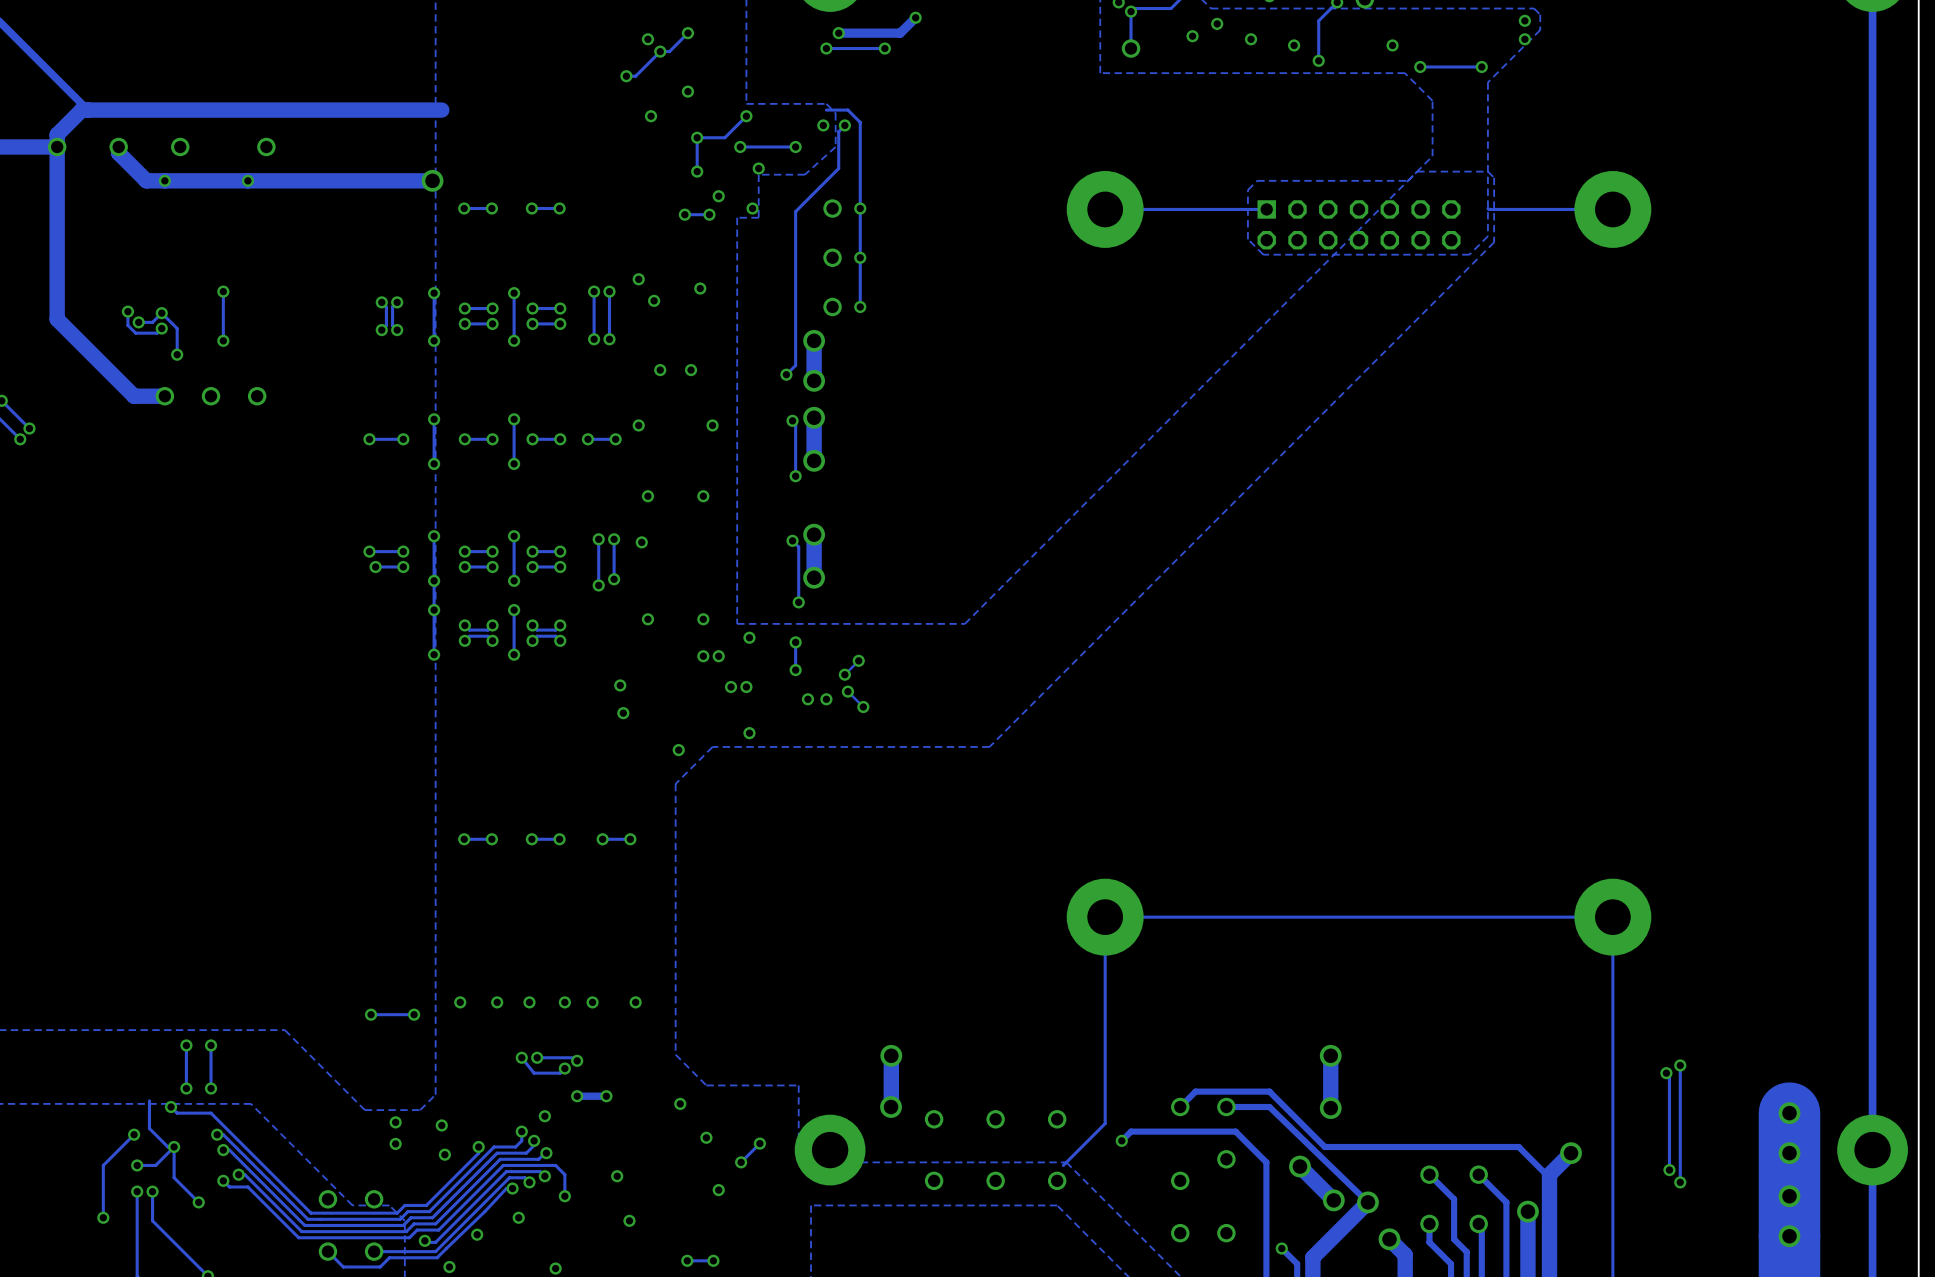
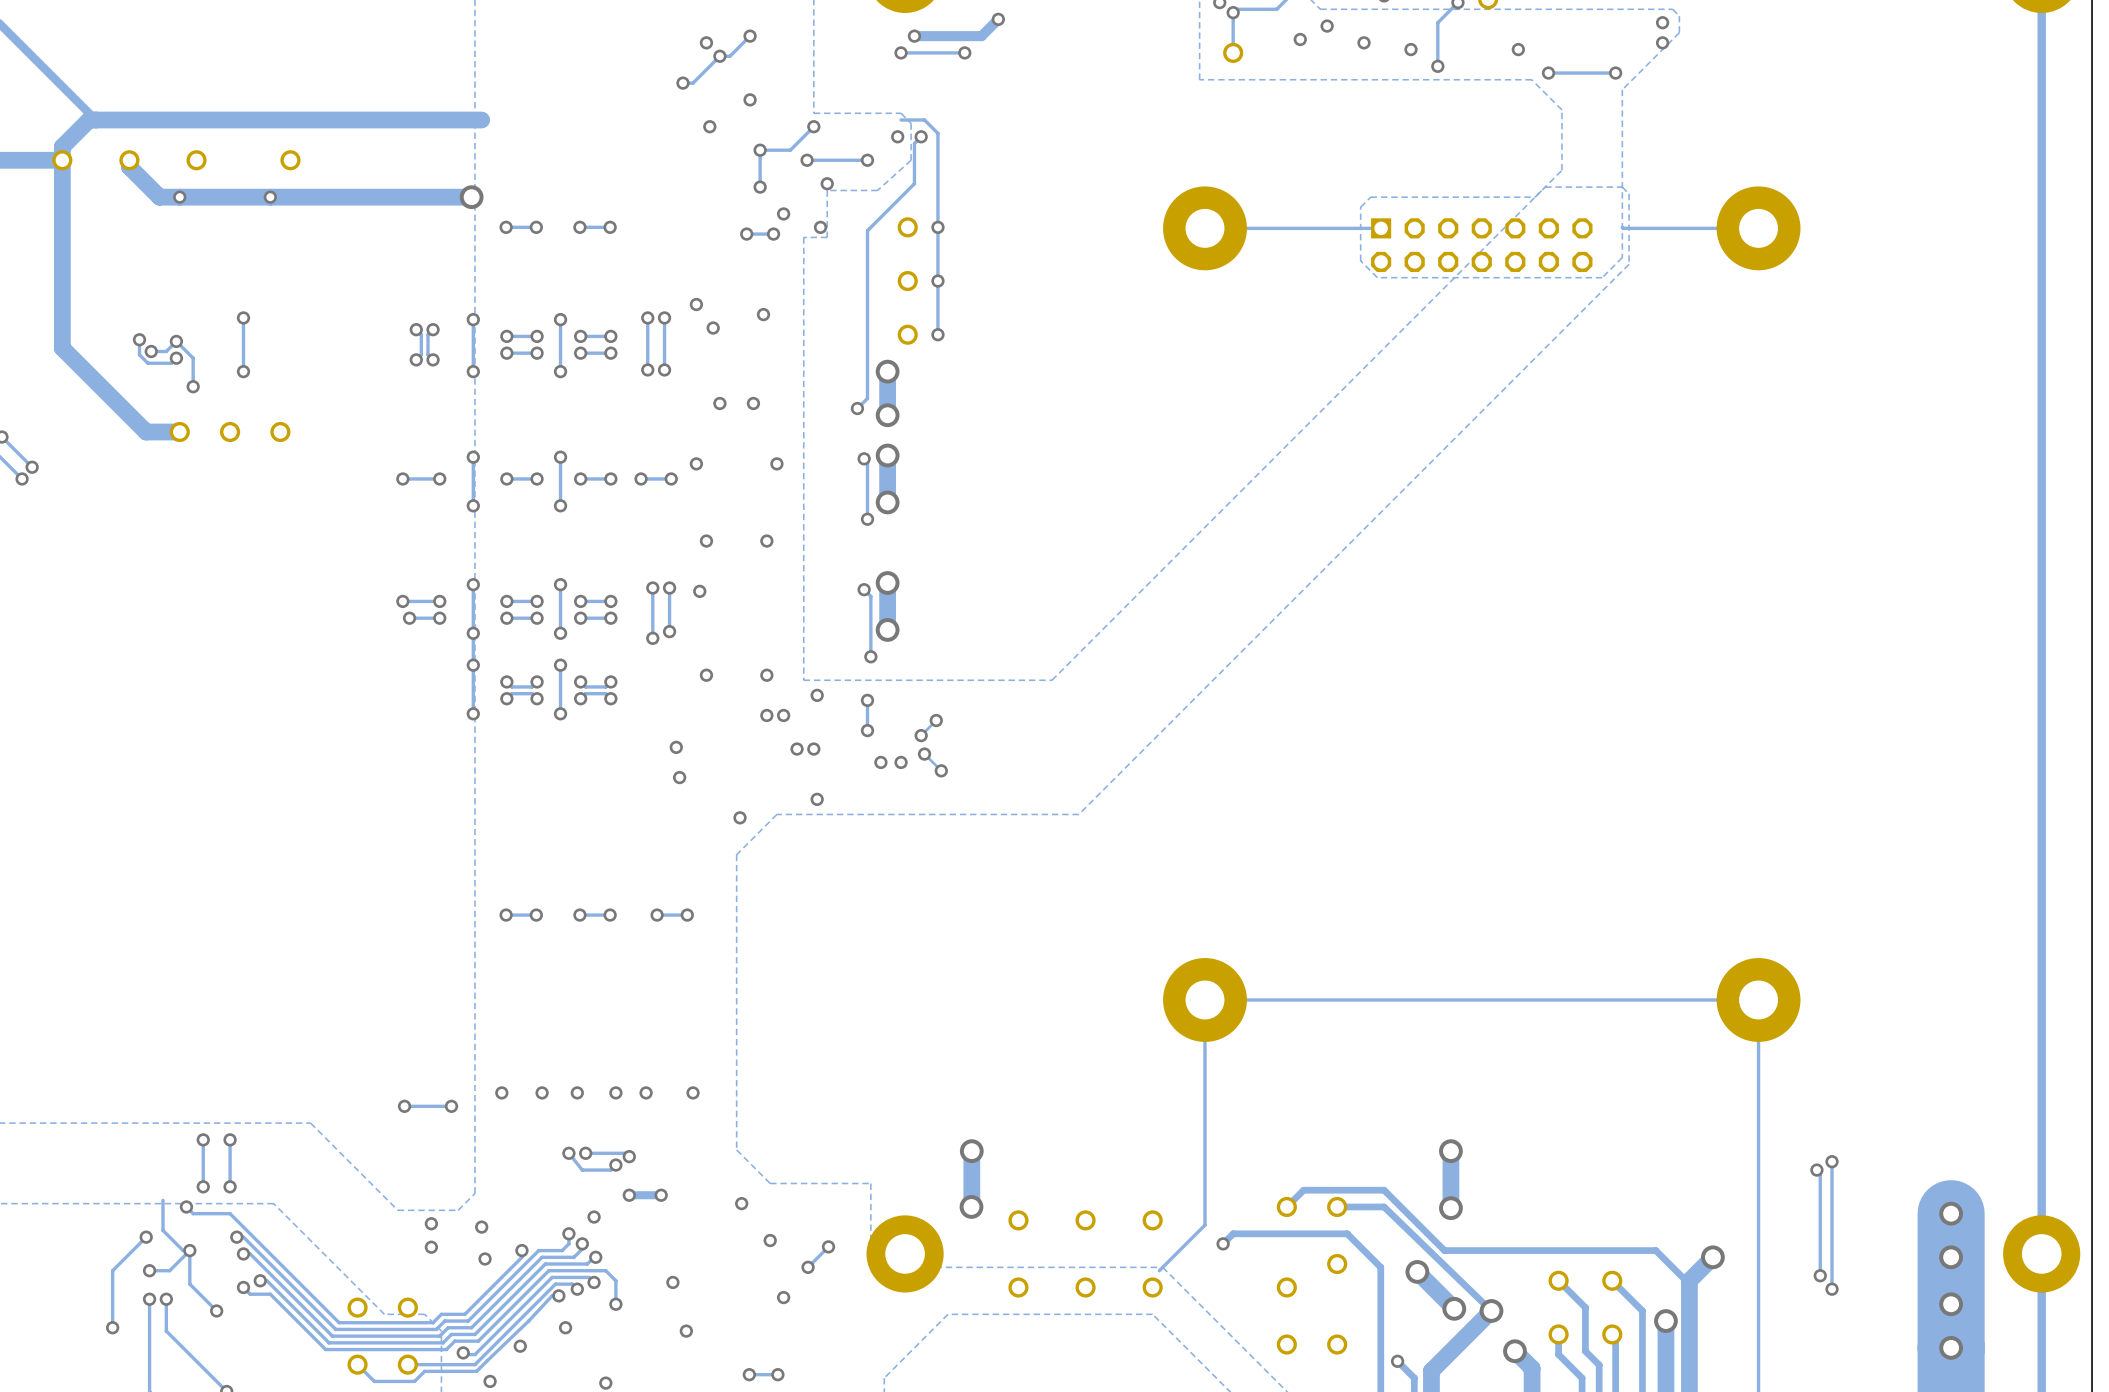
zone outline: (869, 1205) (811, 1205) (811, 1263) -> (948, 1314) (884, 1378)

